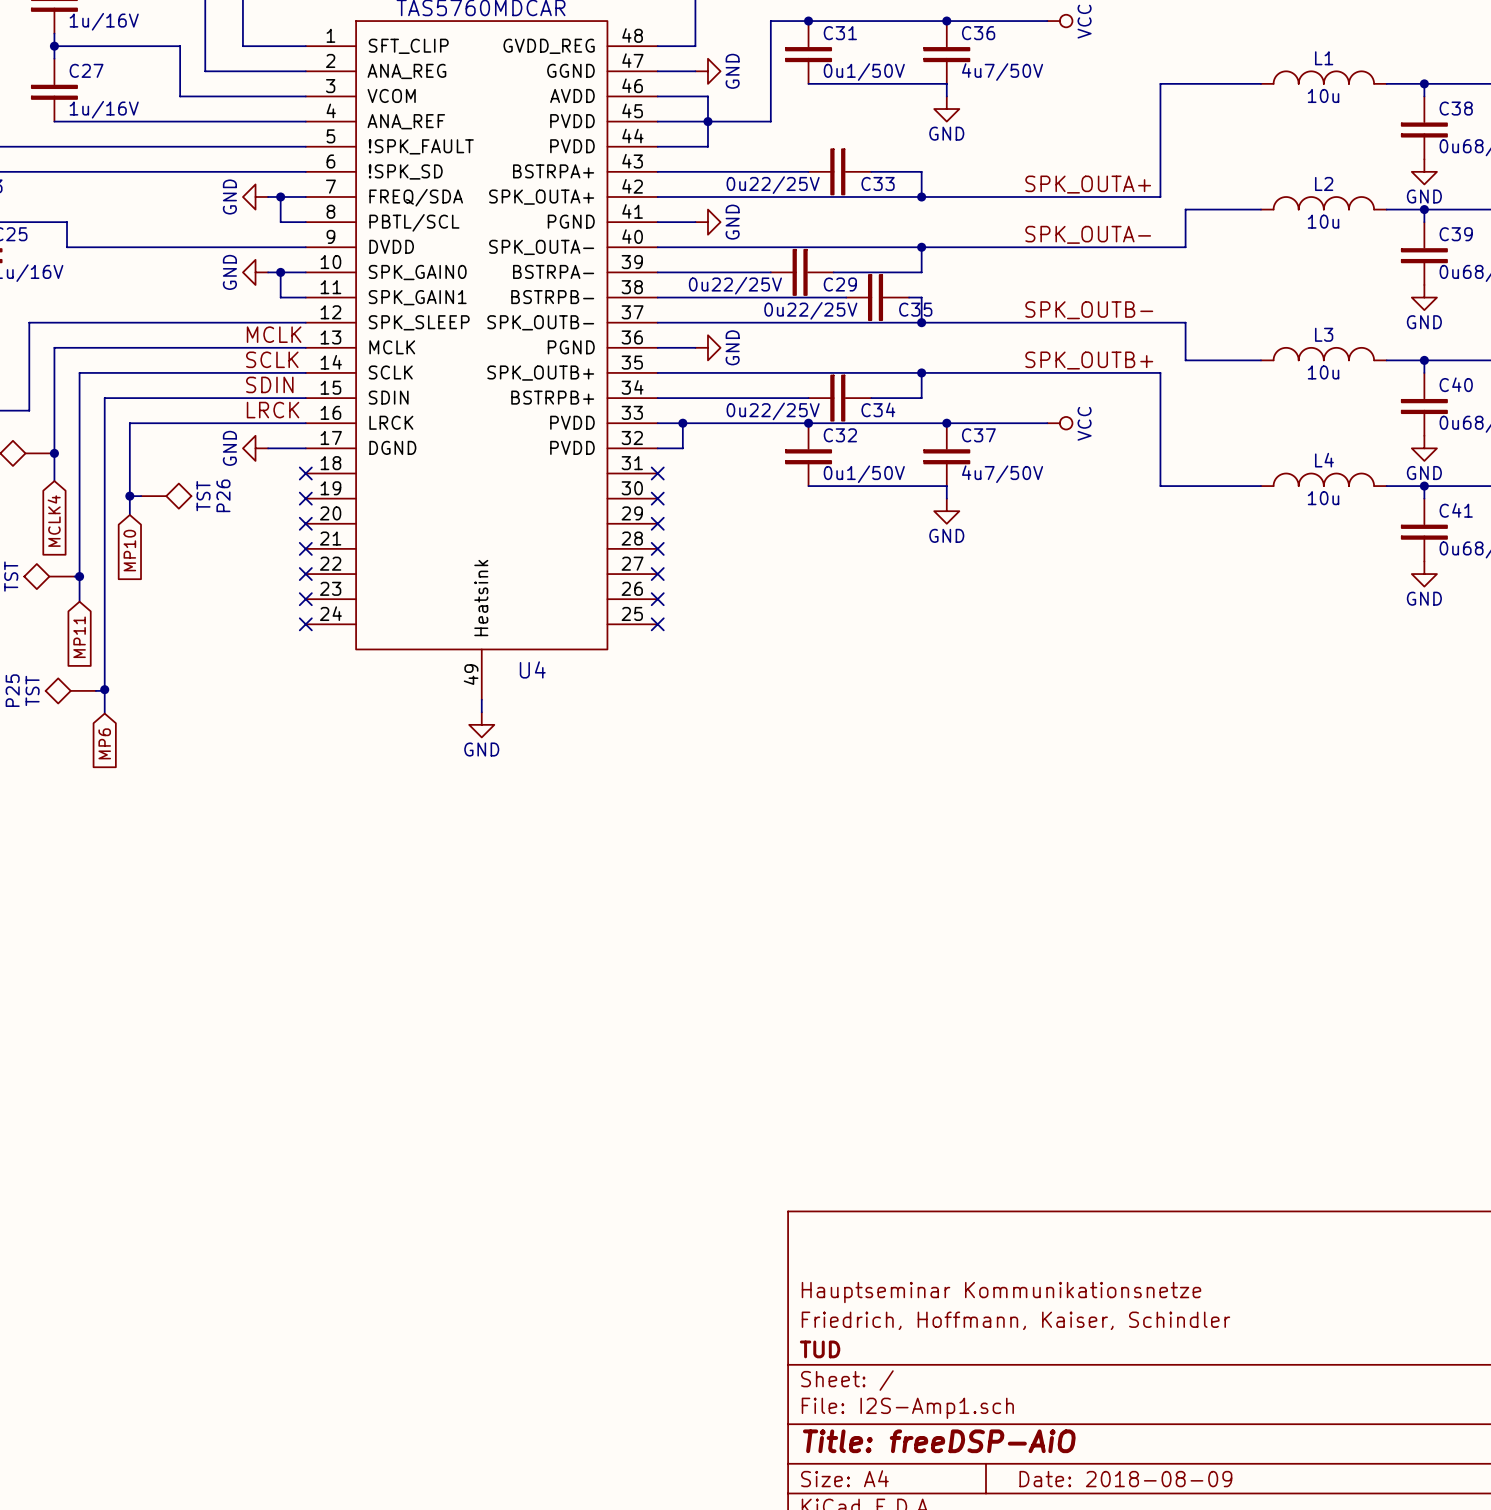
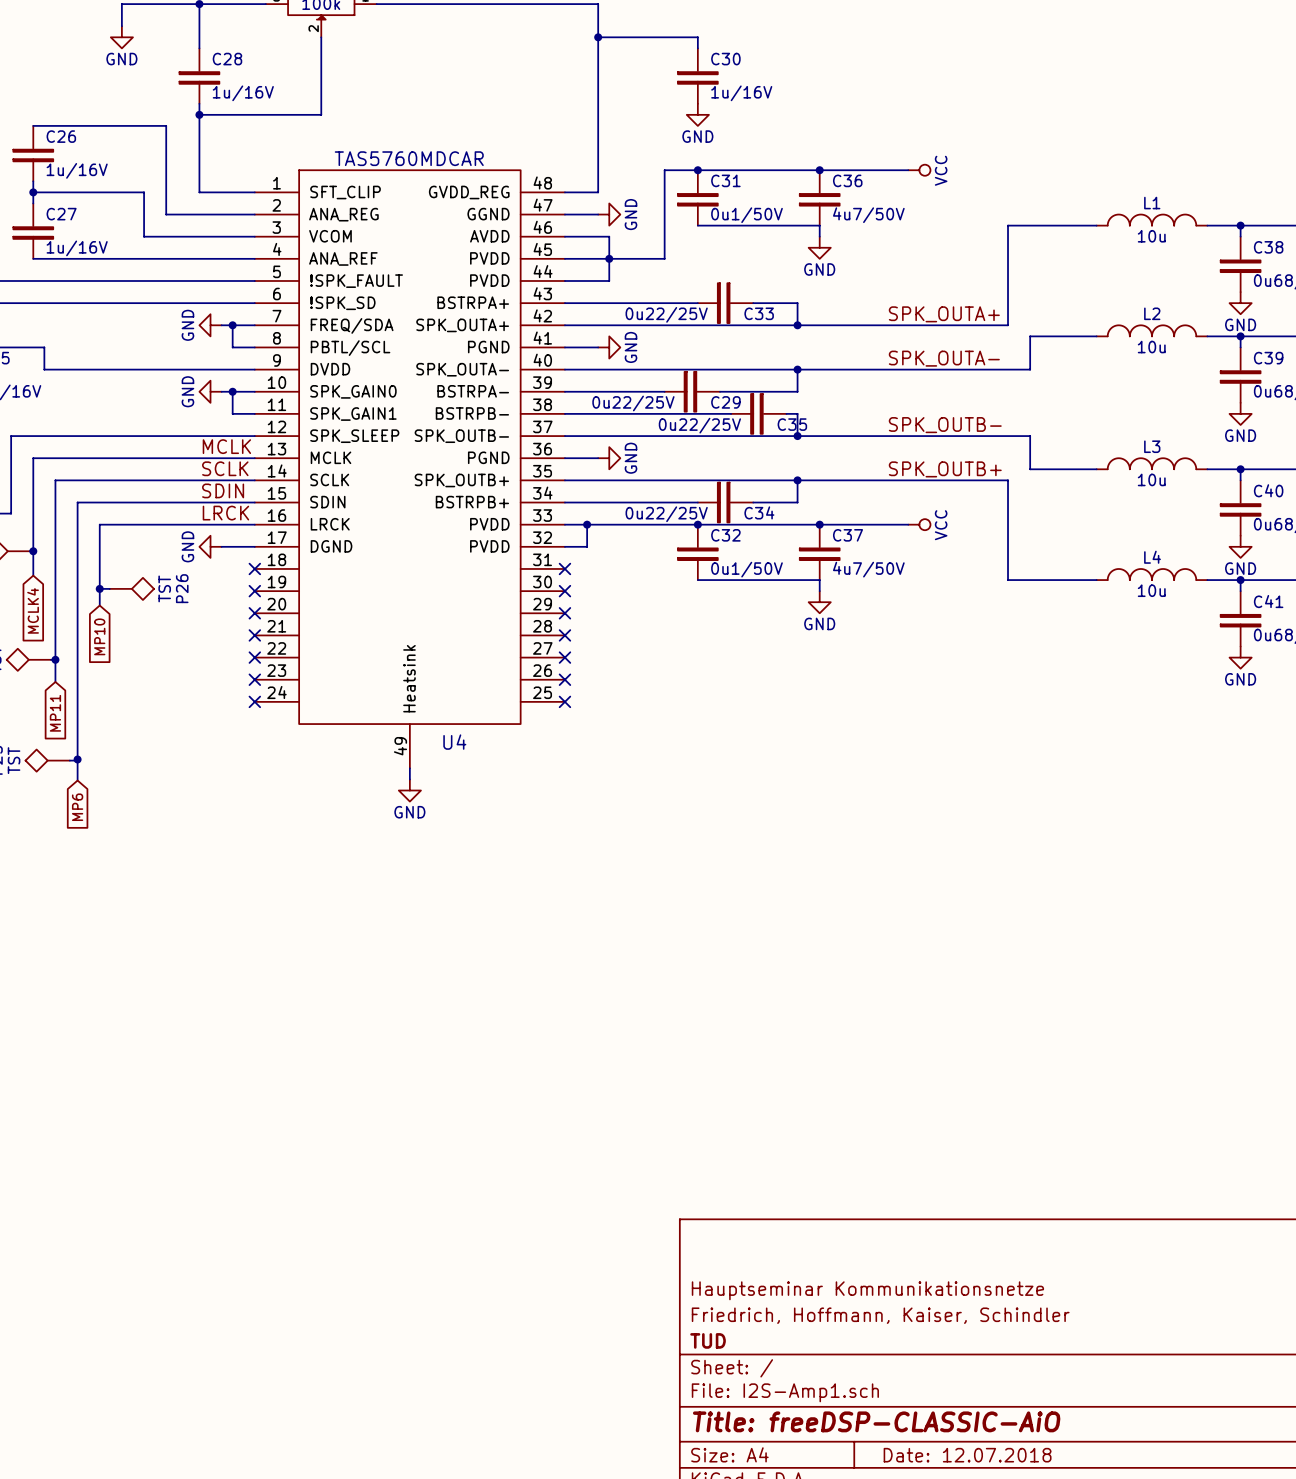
title block: Title: freeDSP-AiO (939, 1441) -> Title: freeDSP-CLASSIC-AiO (876, 1421)
title block: Date: 2018-08-09 (1125, 1479) -> Date: 12.07.2018 (967, 1455)

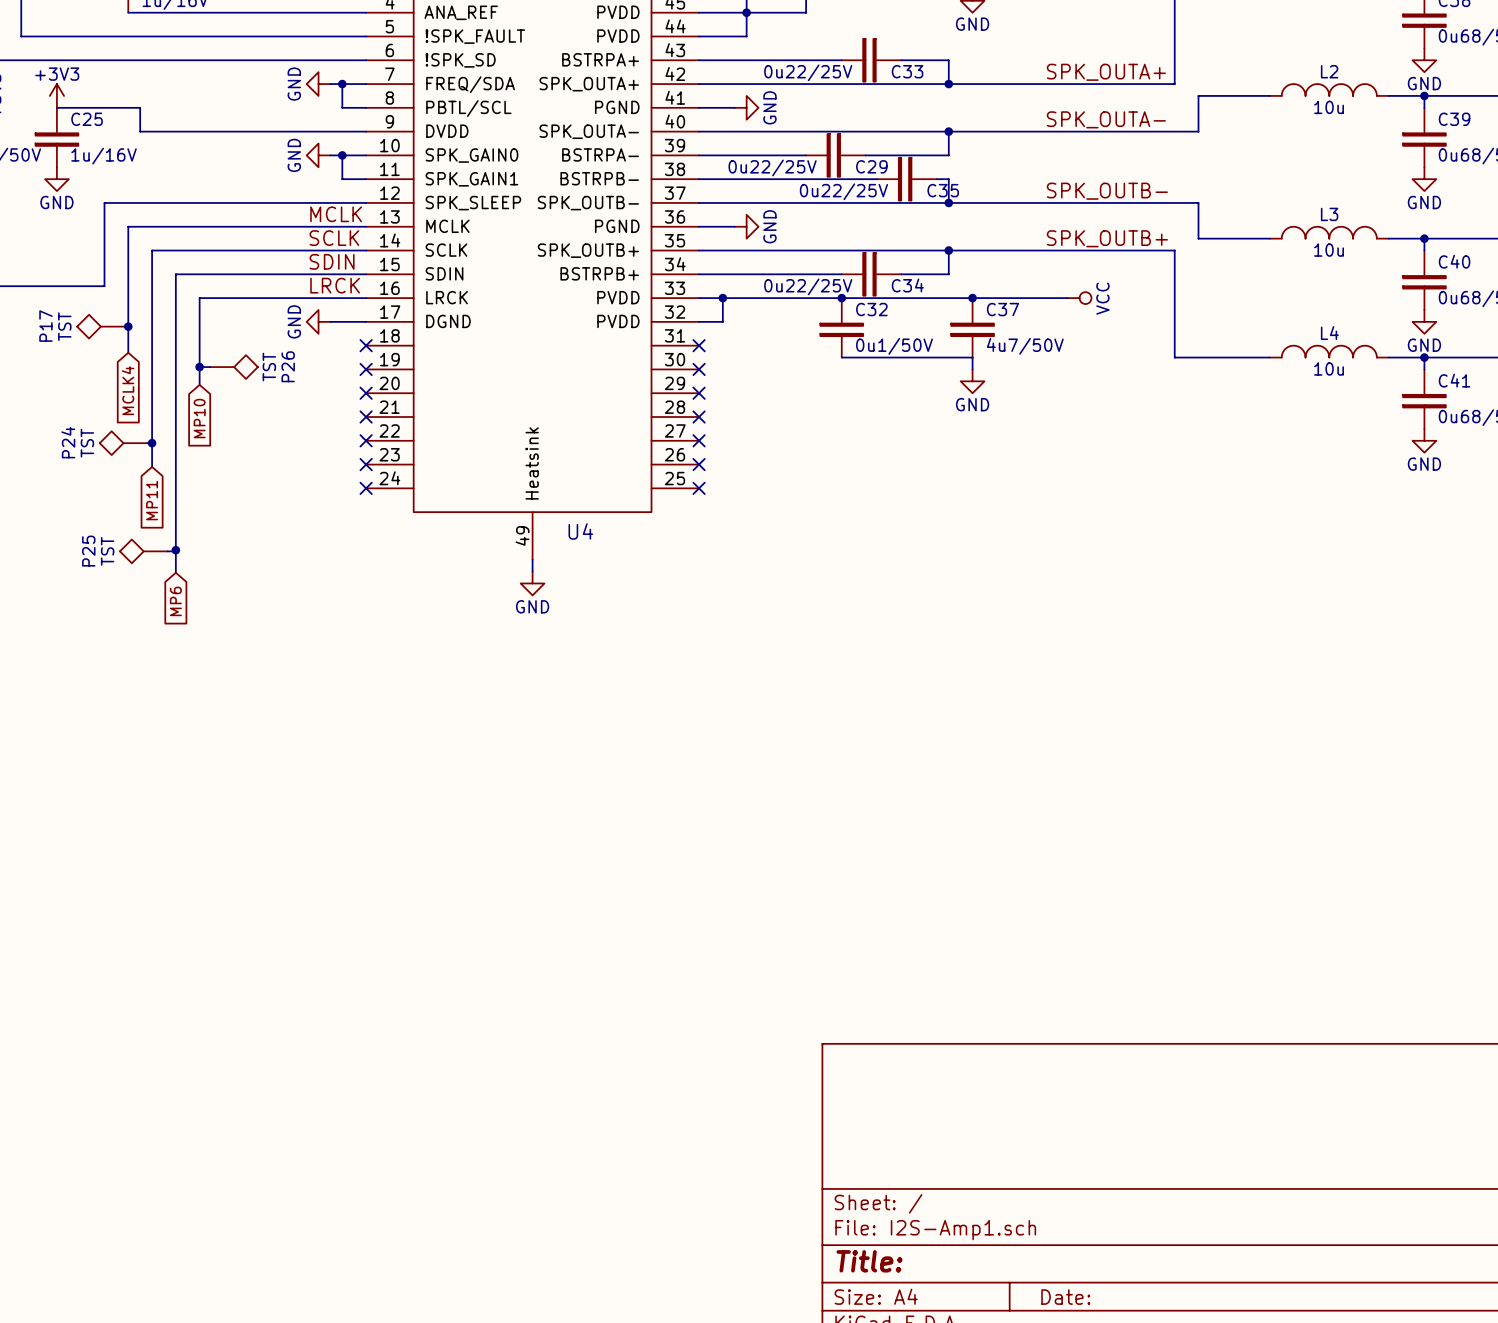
title block: Hauptseminar Kommunikationsnetze (867, 1290) -> none
title block: Friedrich, Hoffmann, Kaiser, Schindler (880, 1315) -> none
title block: TUD (708, 1340) -> none
title block: Title: freeDSP-CLASSIC-AiO (876, 1421) -> Title: (869, 1261)
title block: Date: 12.07.2018 (967, 1455) -> Date: (1065, 1297)

